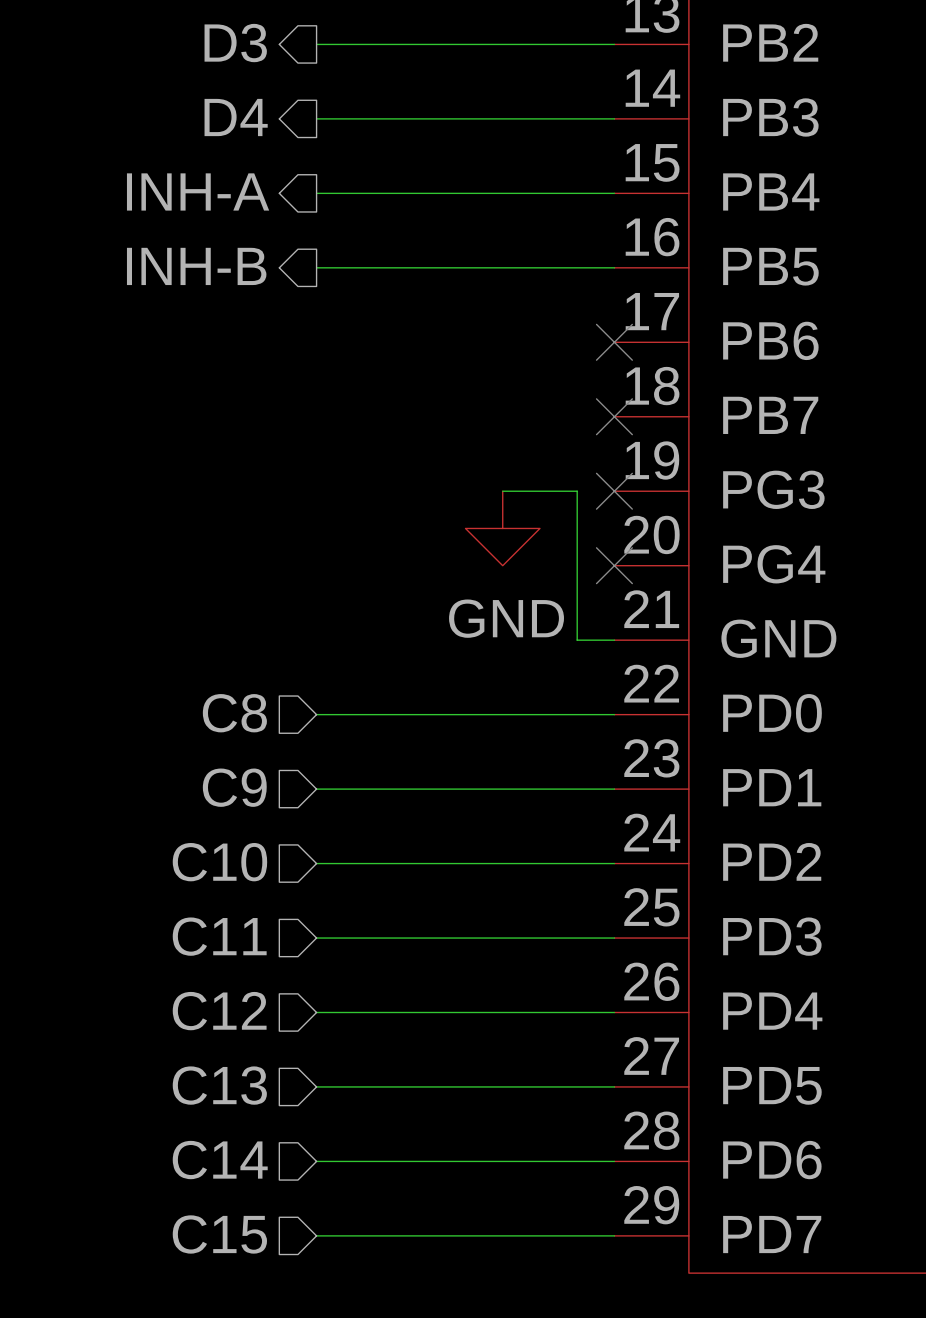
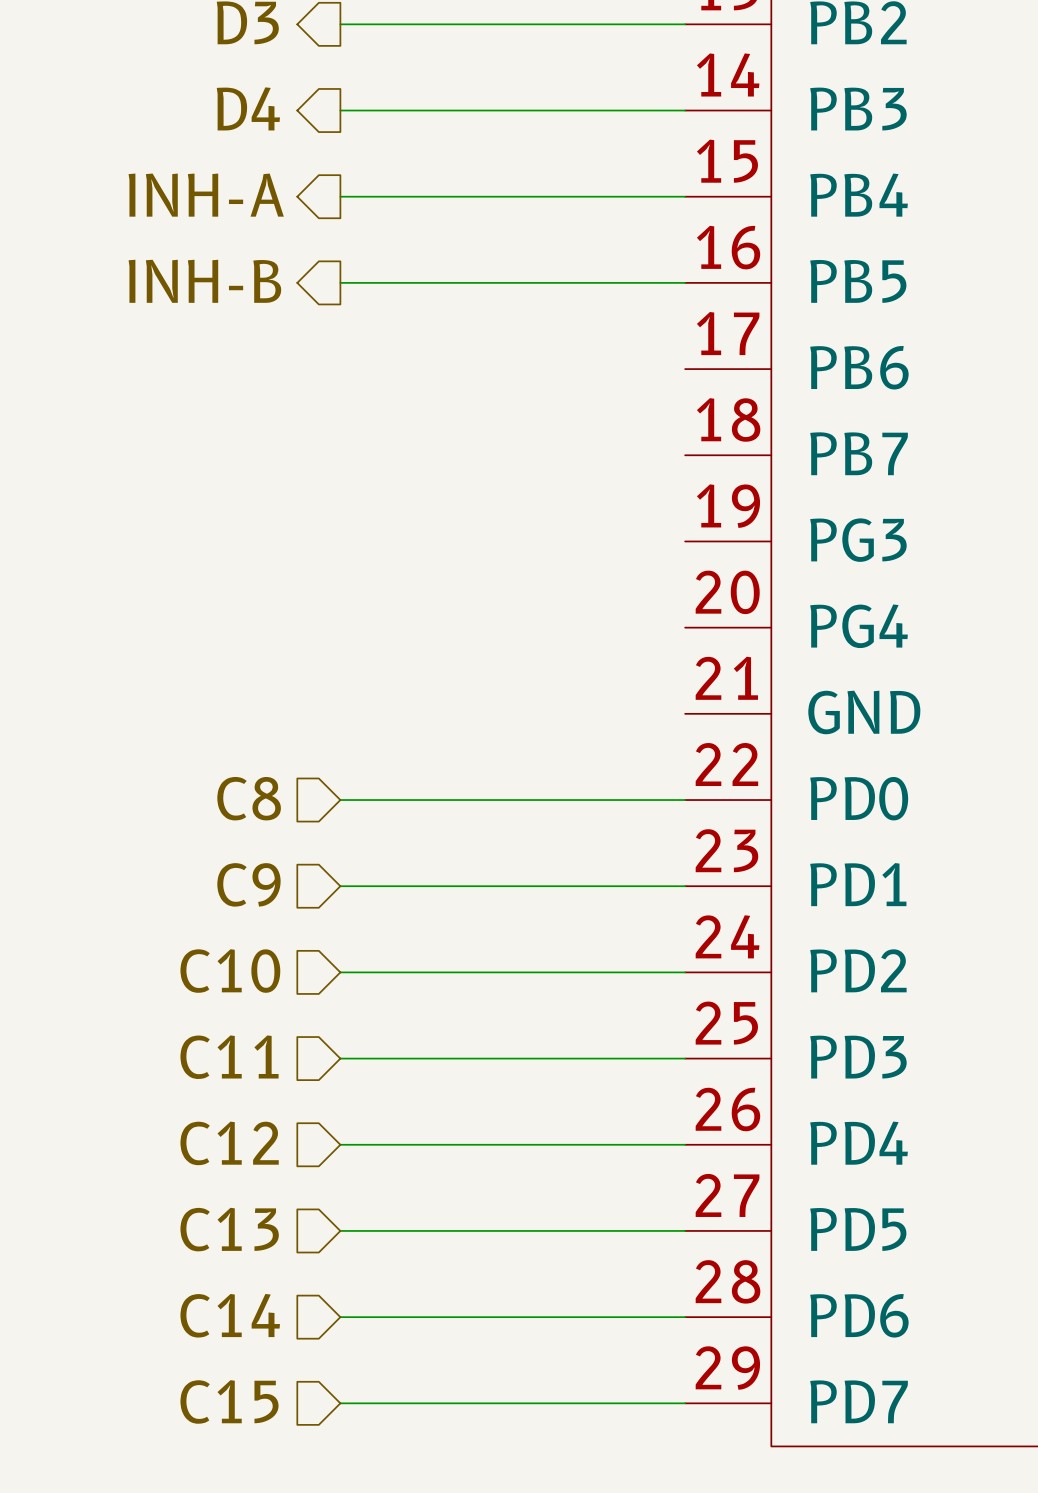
no-connect mark: (614, 342) -> none
no-connect mark: (614, 416) -> none
wire: (502, 491) (577, 491) (577, 640) (614, 640) -> none
no-connect mark: (614, 491) -> none
power symbol: GND (502, 528) -> none
no-connect mark: (614, 565) -> none

